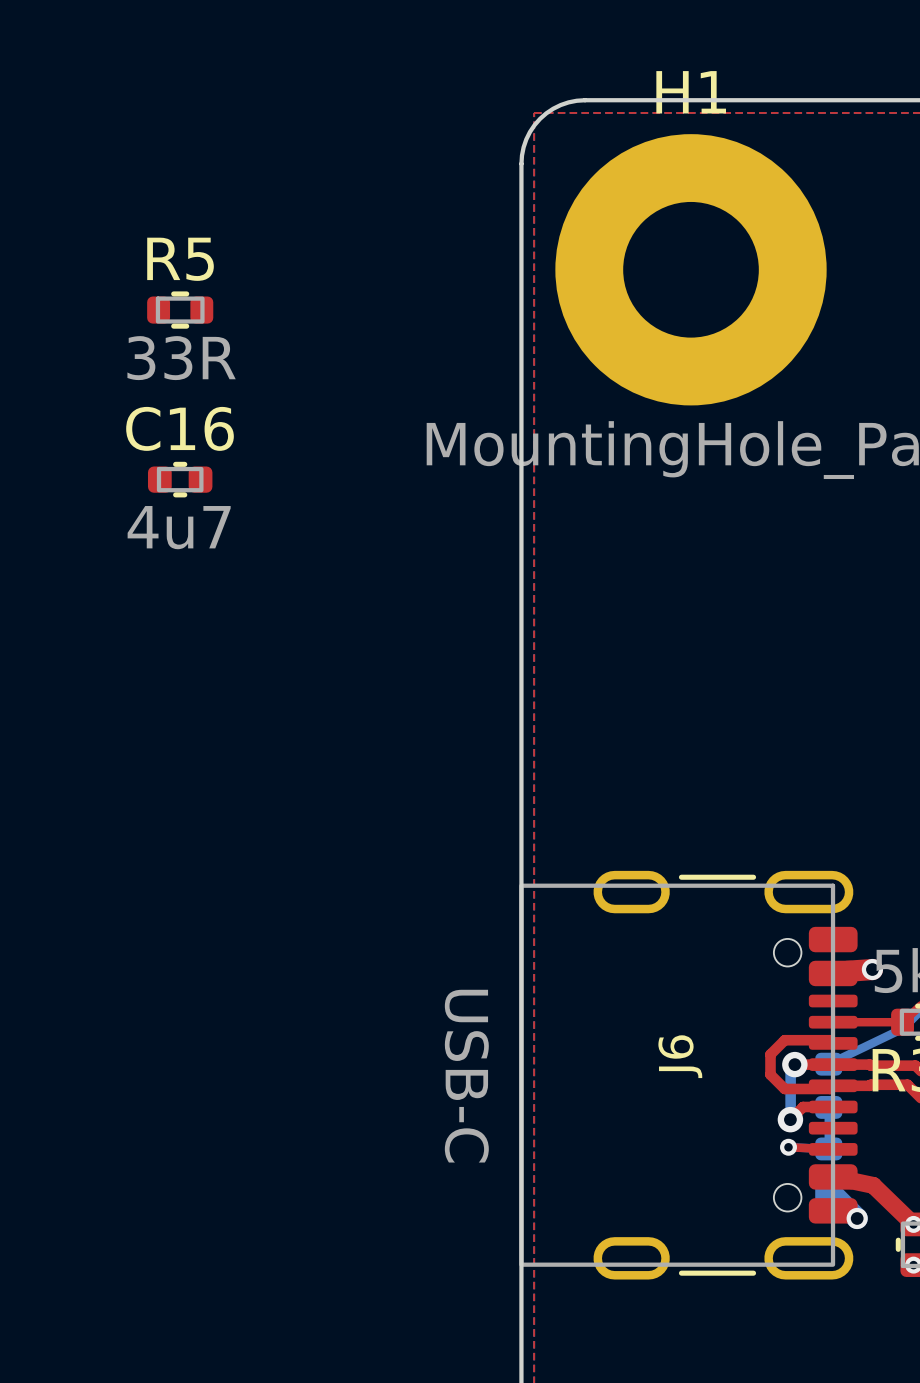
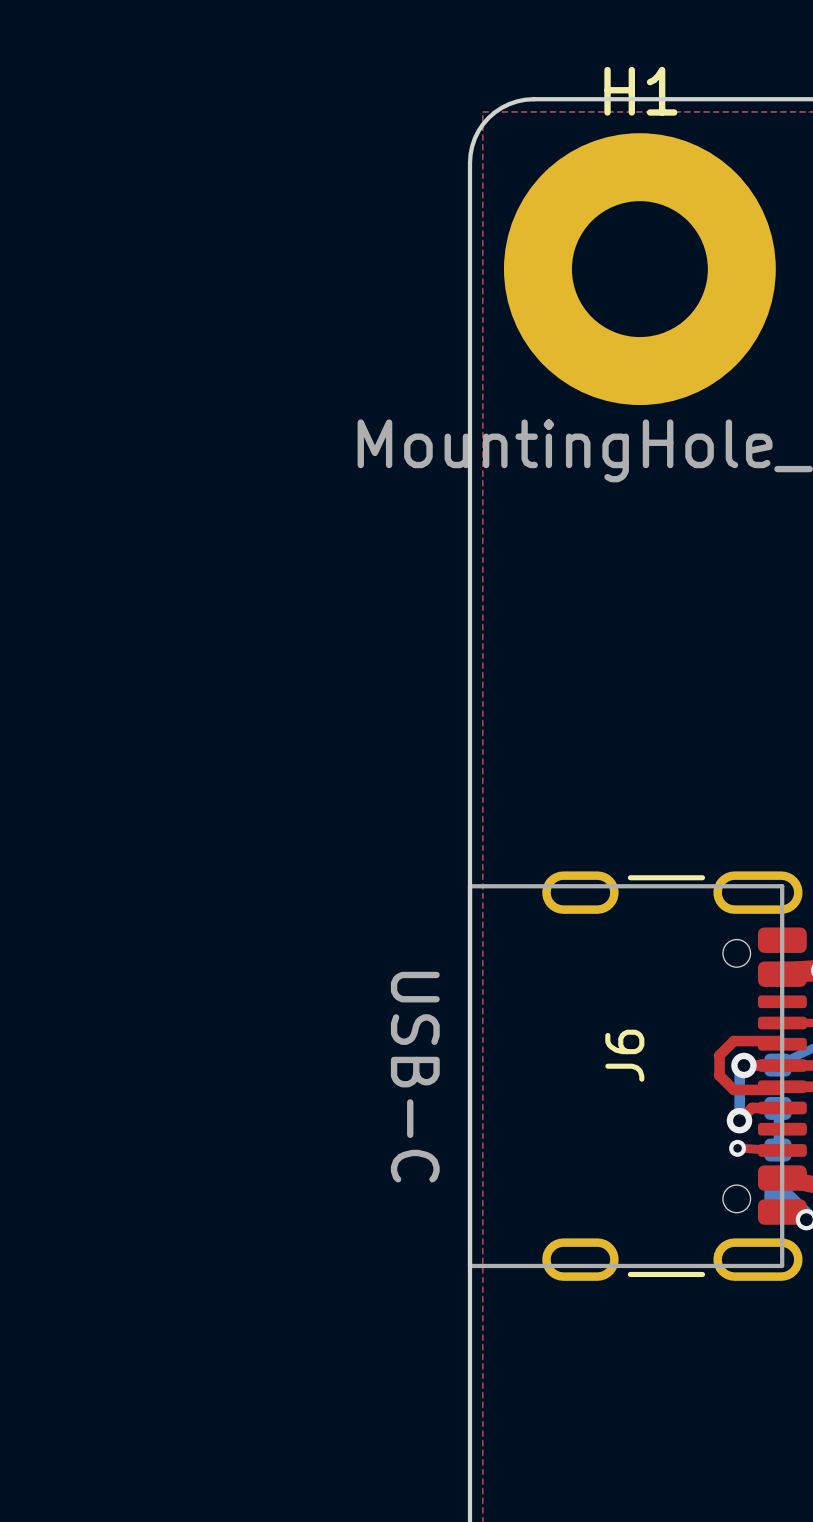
R5: 33R (180, 310) -> none
C16: 4u7 (180, 479) -> none

